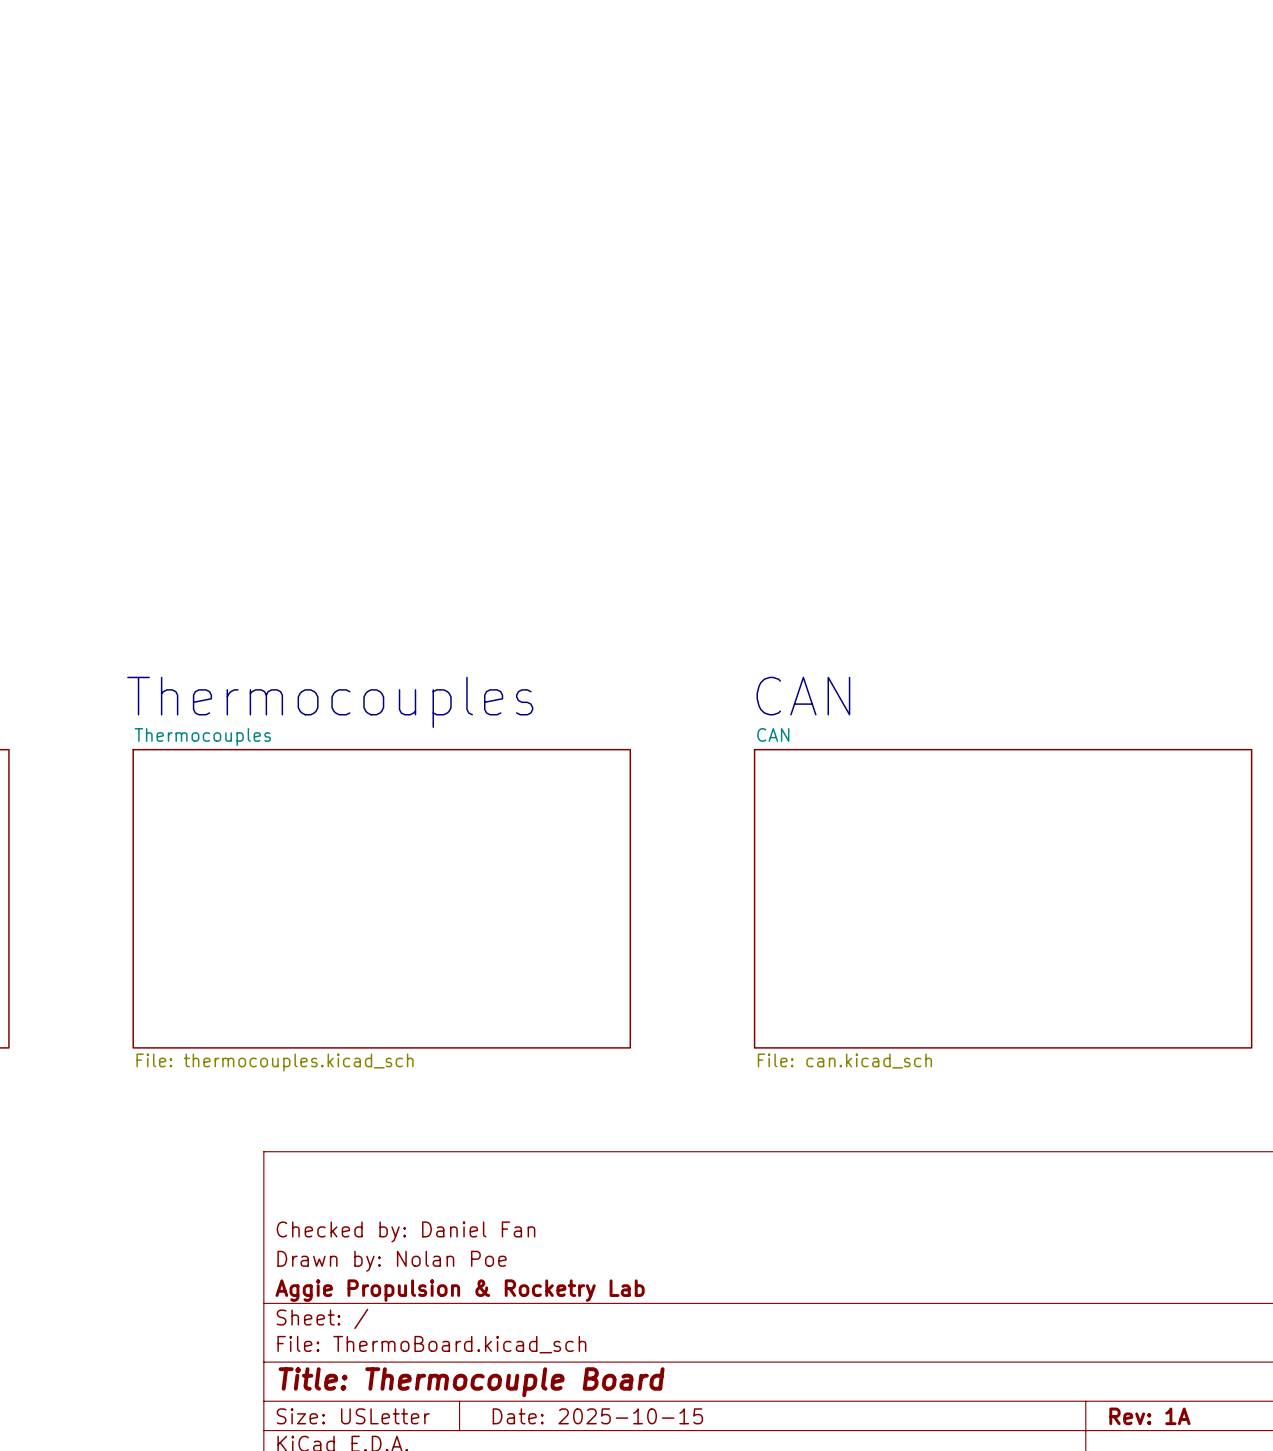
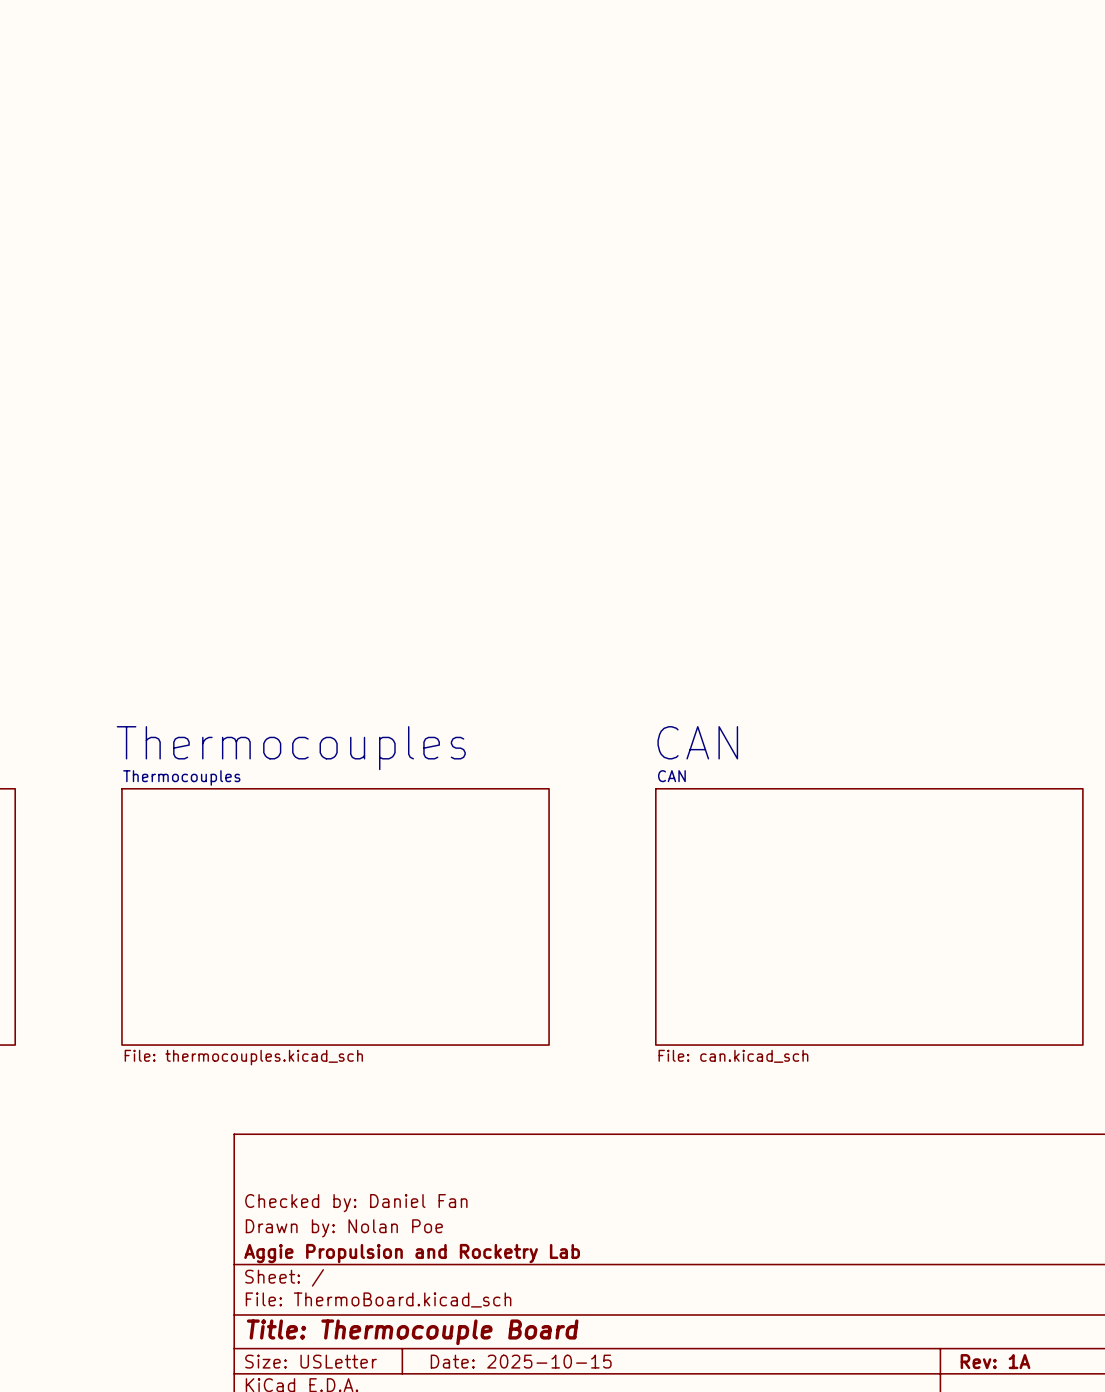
title block: Aggie Propulsion & Rocketry Lab (460, 1290) -> Aggie Propulsion and Rocketry Lab (412, 1253)

